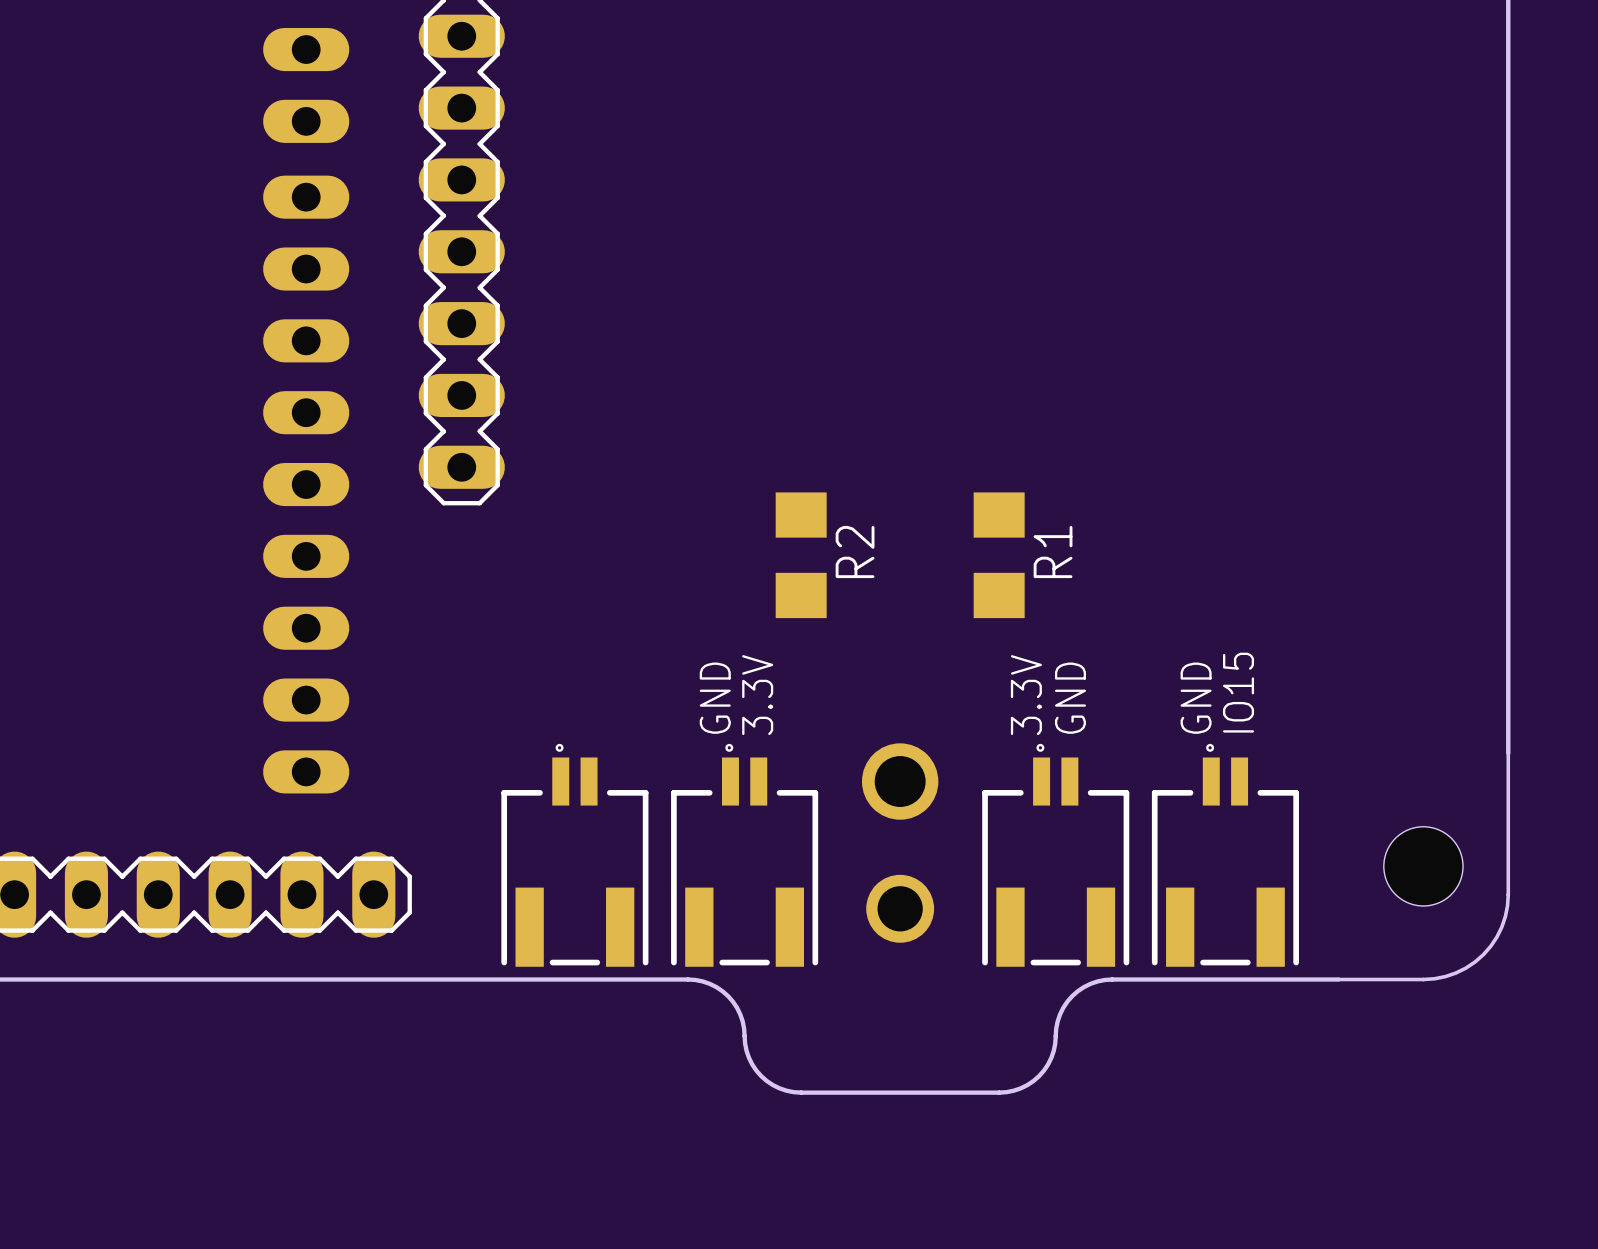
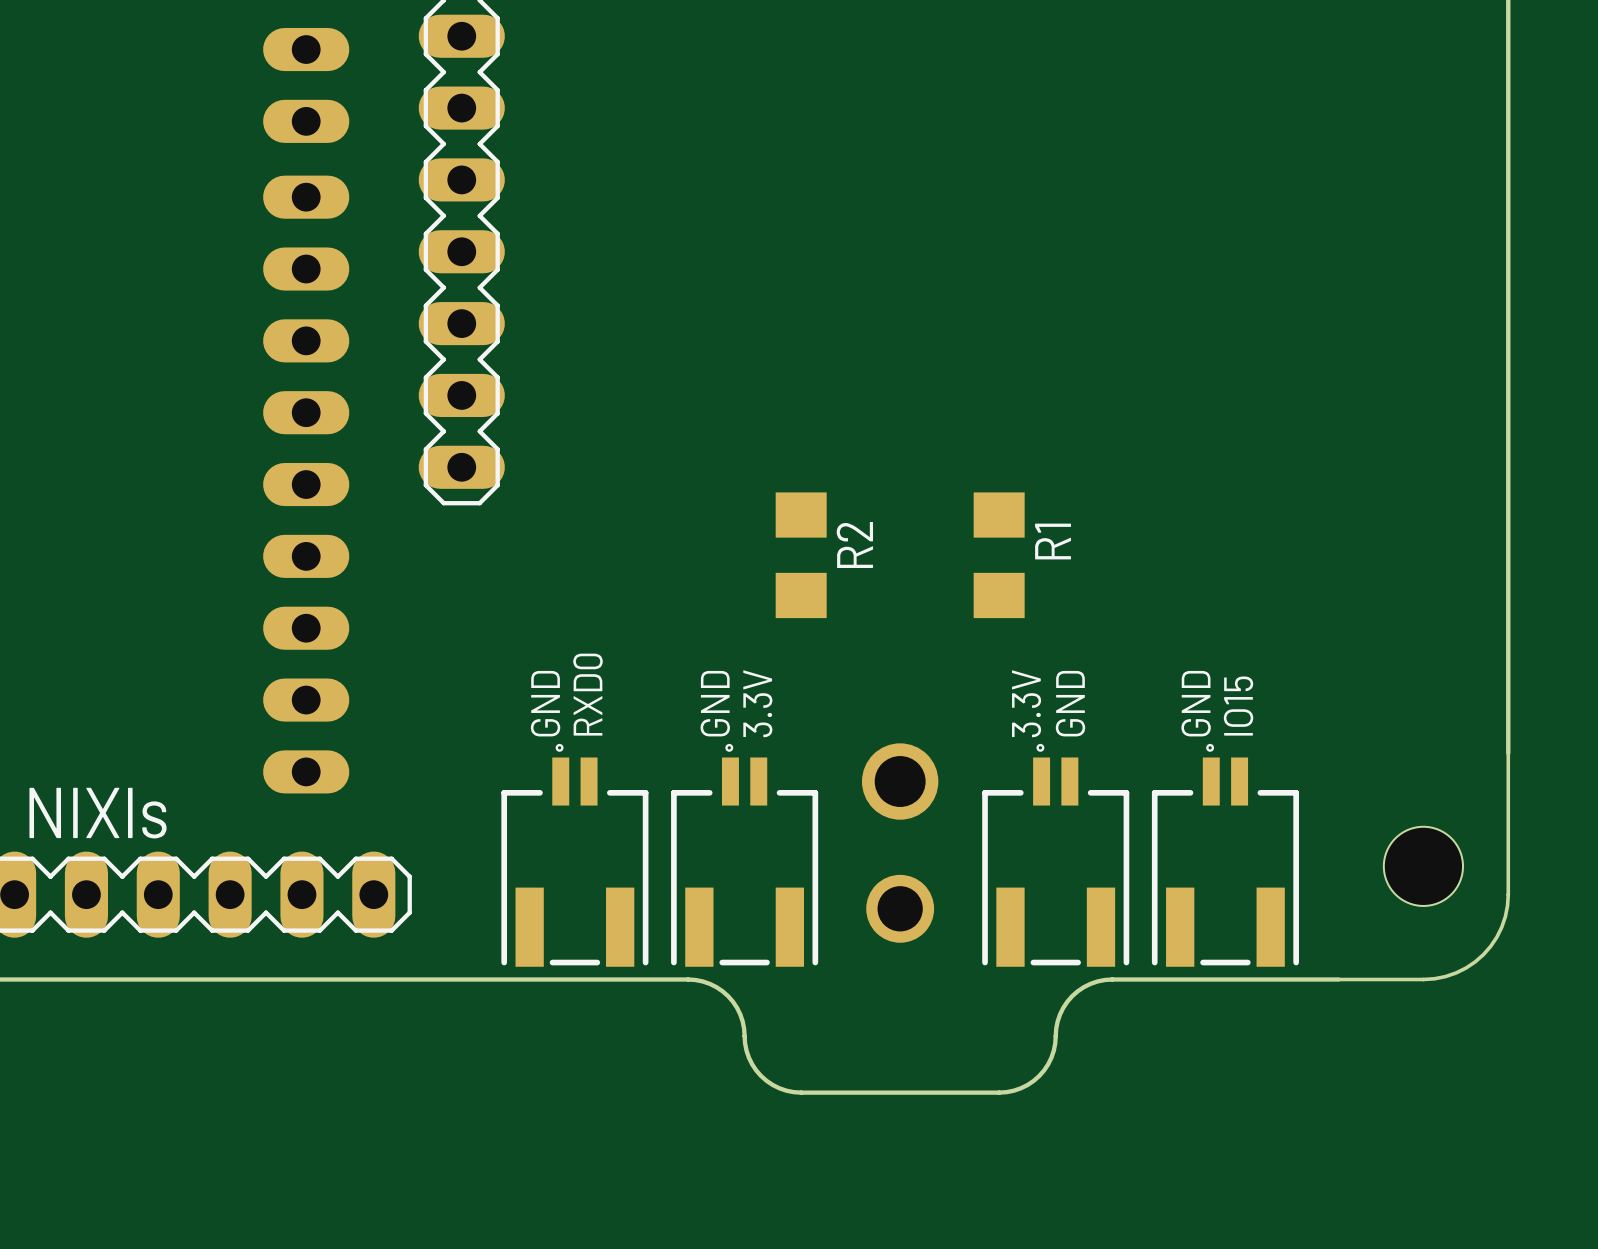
text: none -> RXD0 (588, 694)
text: none -> GND (545, 703)
text: none -> NIXIs (98, 813)

